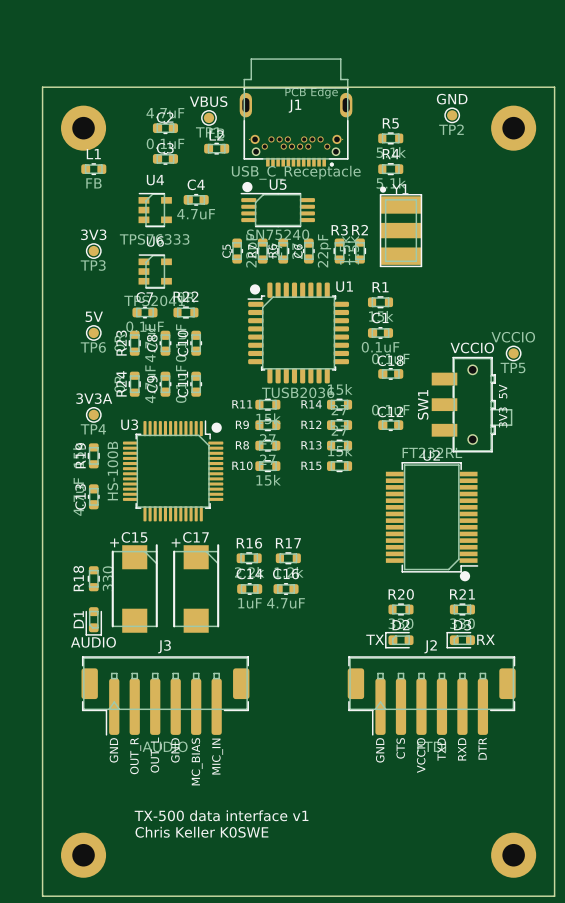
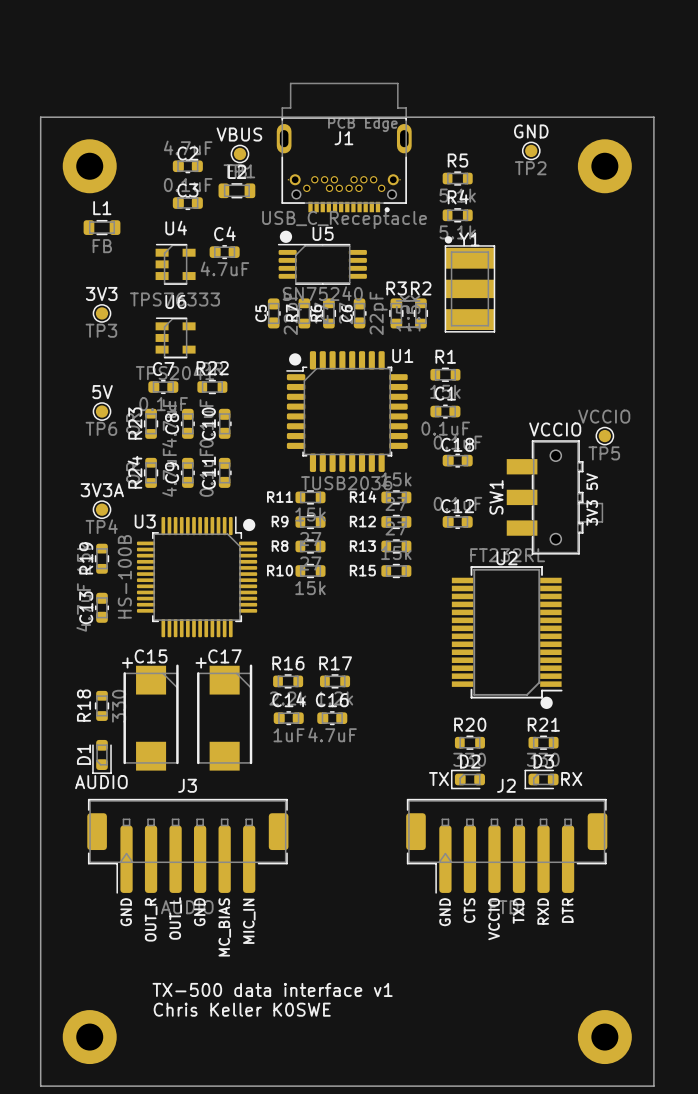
L2 footprint: [204, 142, 230, 155] -> [218, 183, 256, 199]
L1 footprint: [81, 163, 107, 175] -> [83, 219, 121, 236]

